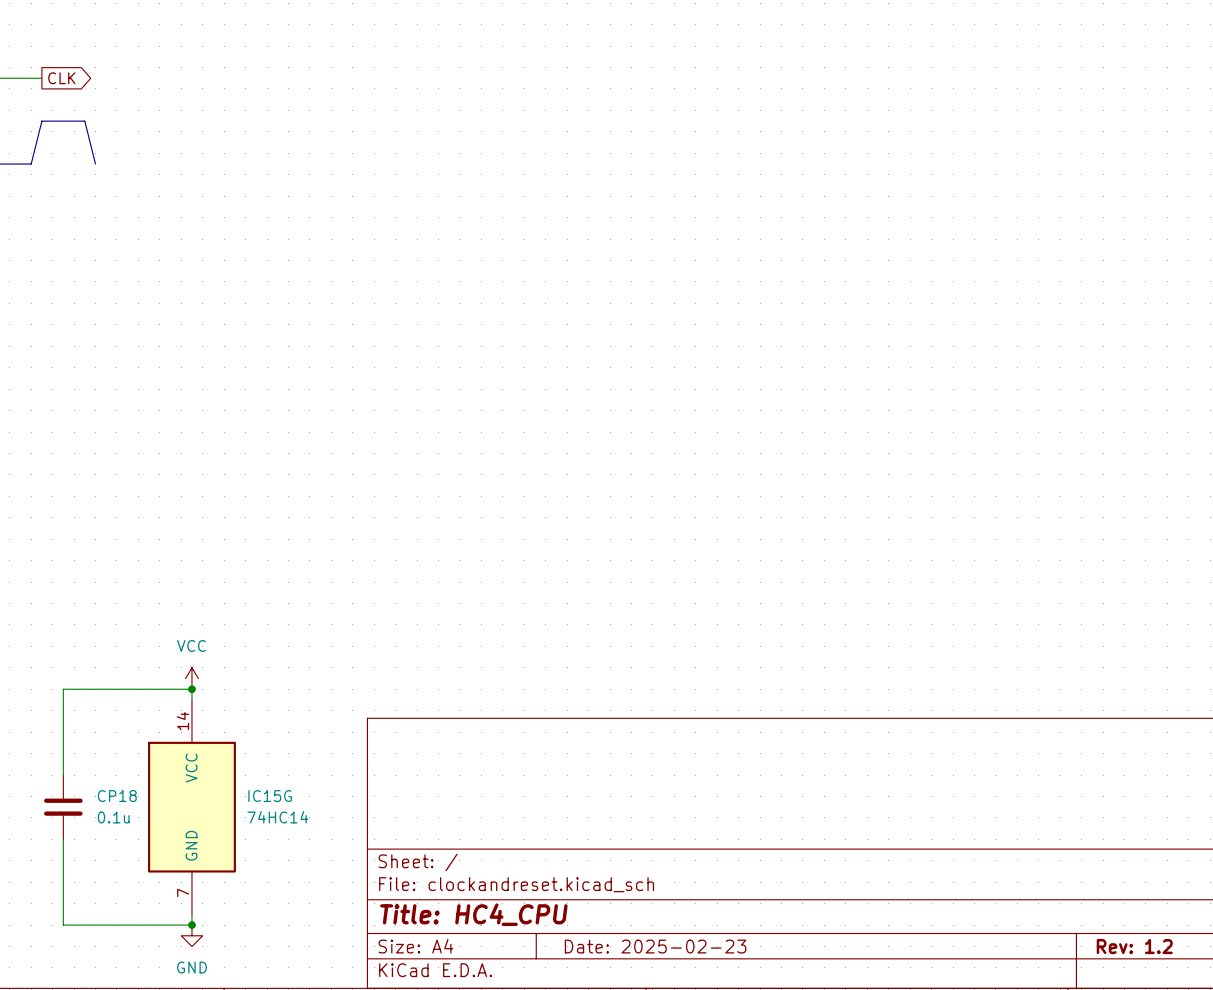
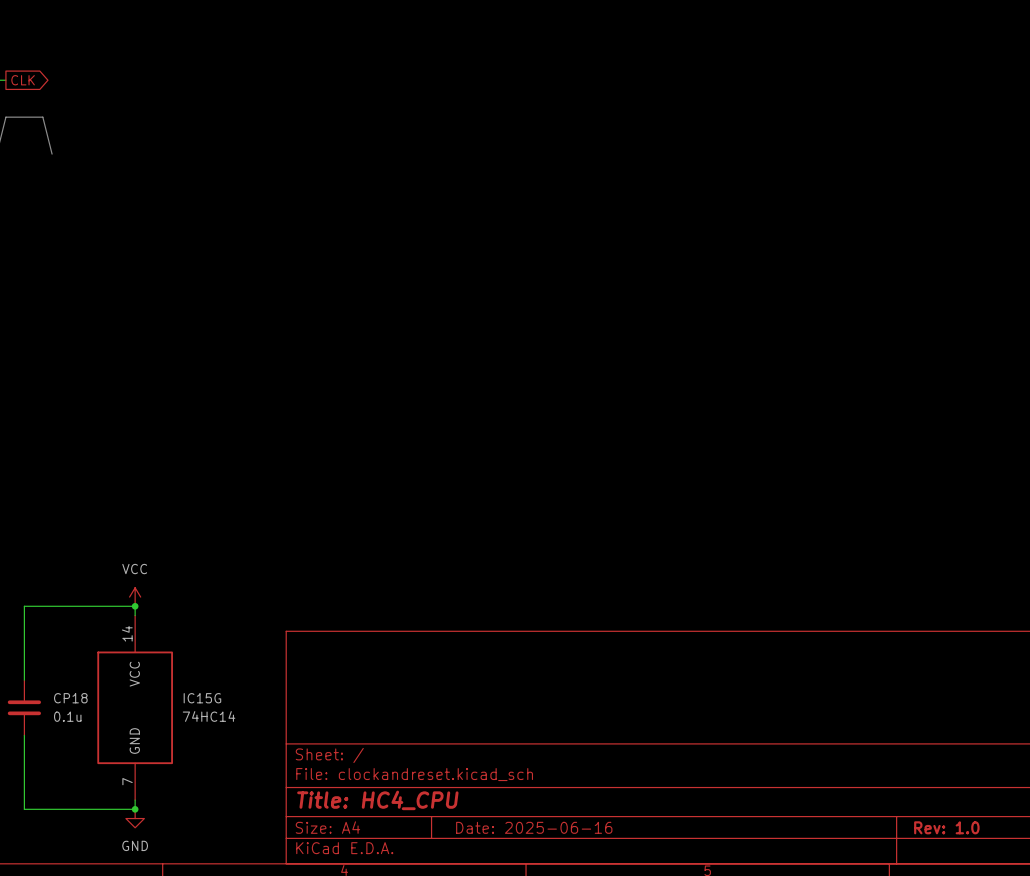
title block: Date: 2025-02-23 (655, 946) -> Date: 2025-06-16 (534, 827)
title block: Rev: 1.2 (1134, 946) -> Rev: 1.0 (946, 827)

